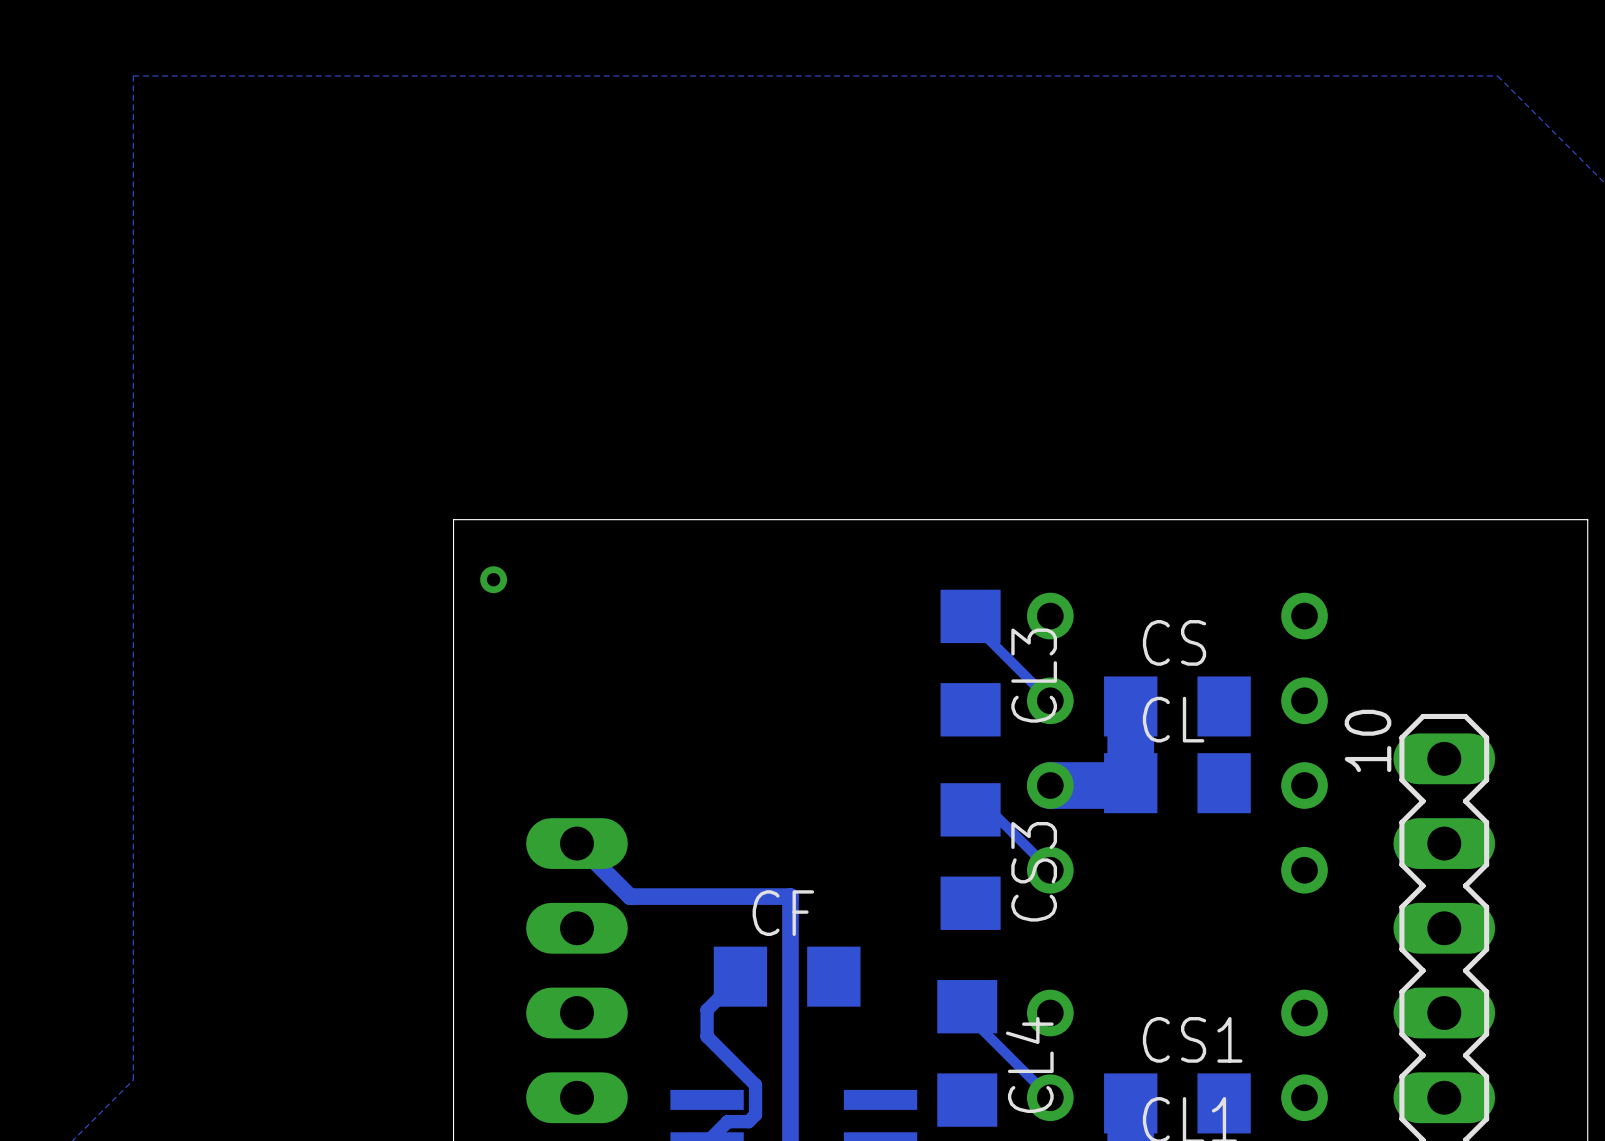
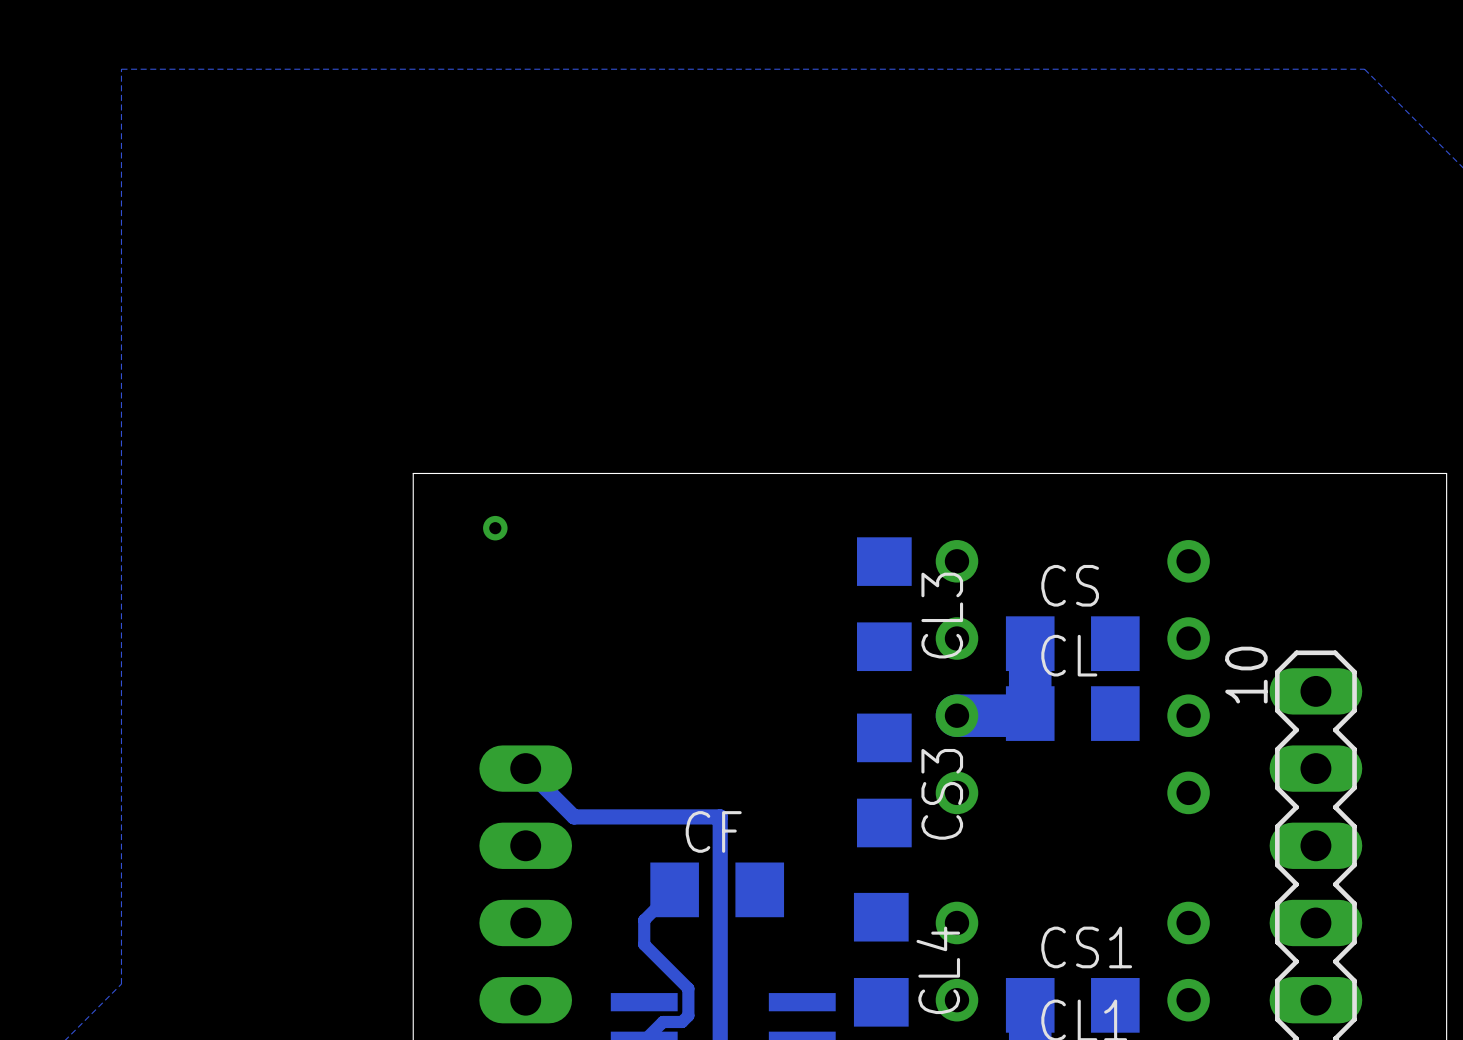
via position: (493, 579) -> (495, 528)
track: (970, 616) (970, 621) (1050, 700) -> none
track: (970, 809) (989, 809) (1050, 870) -> none
track: (967, 1006) (967, 1014) (1050, 1097) -> none

